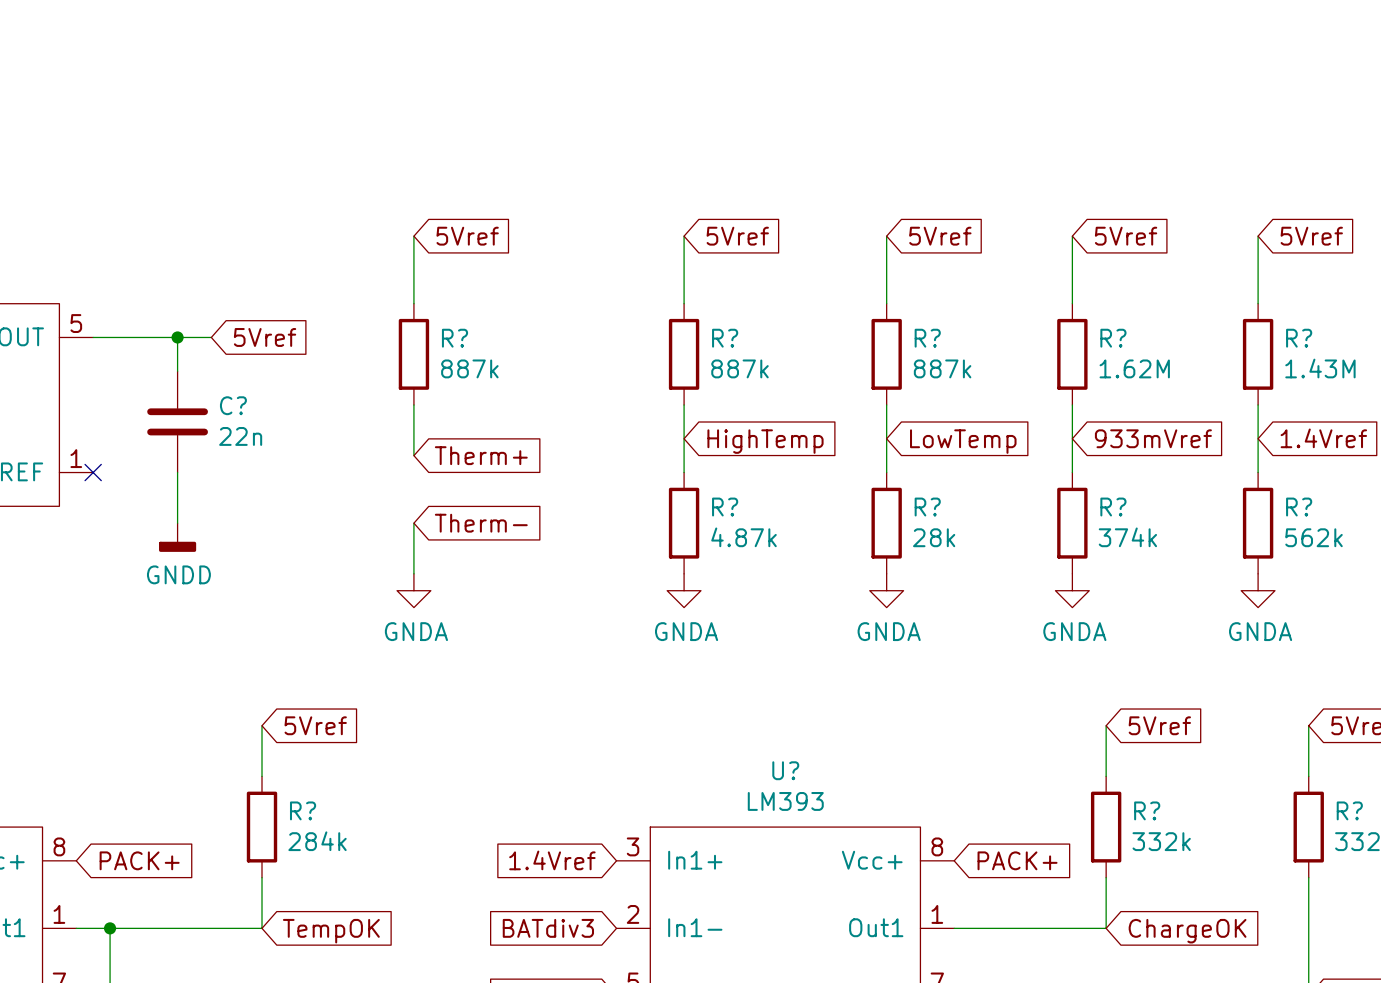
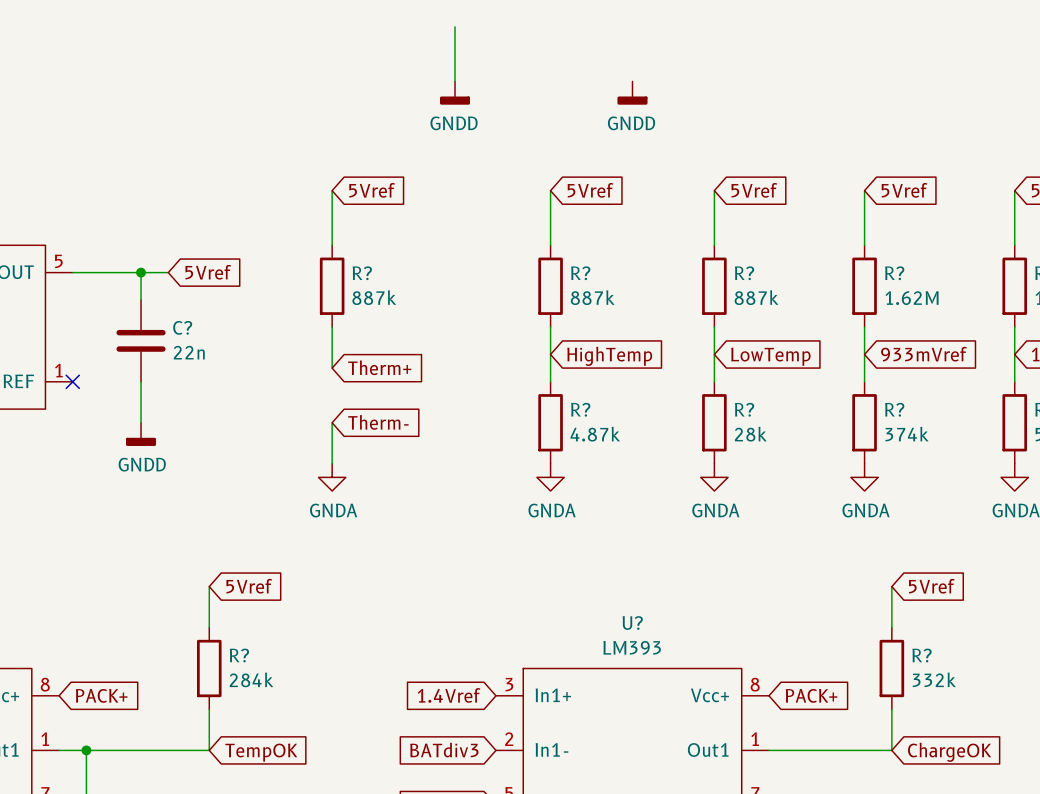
wire: none -> (455, 26) (455, 81)
power symbol: none -> GNDD (455, 93)
power symbol: none -> GNDD (632, 93)

